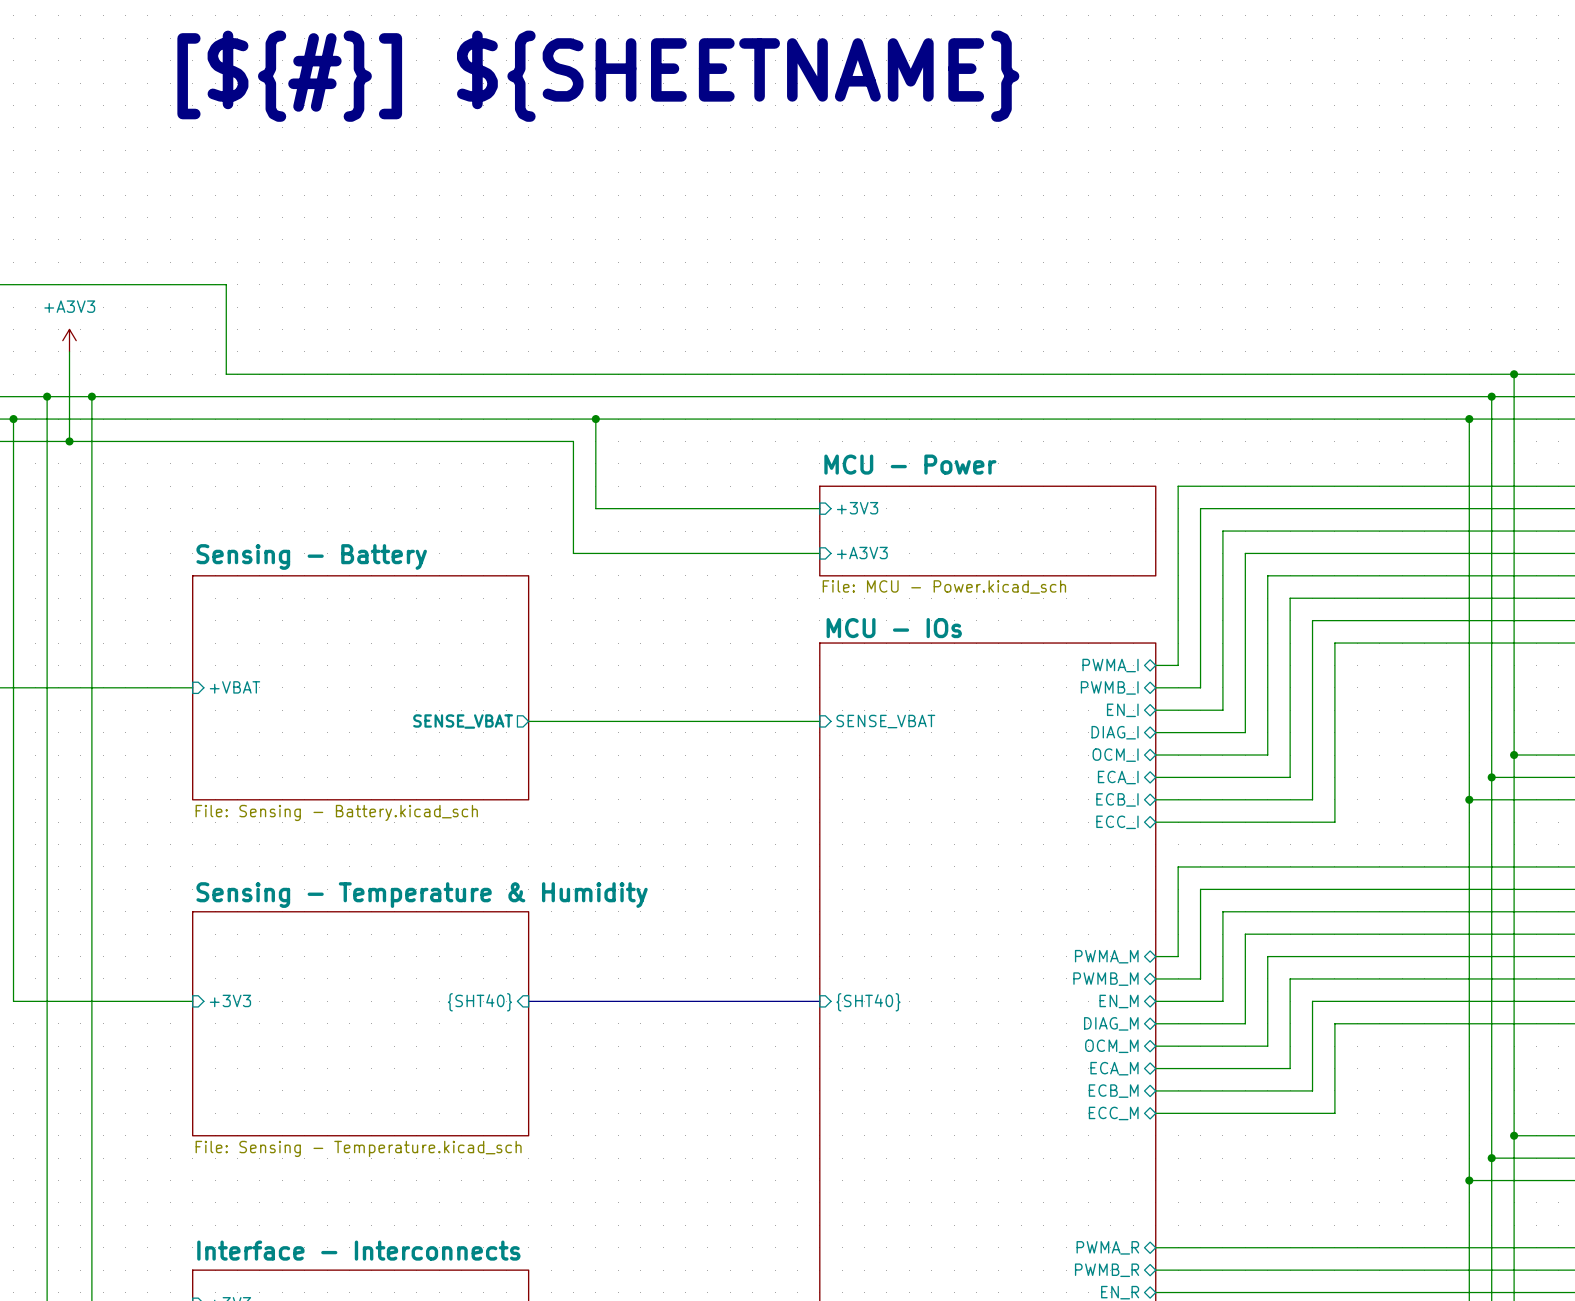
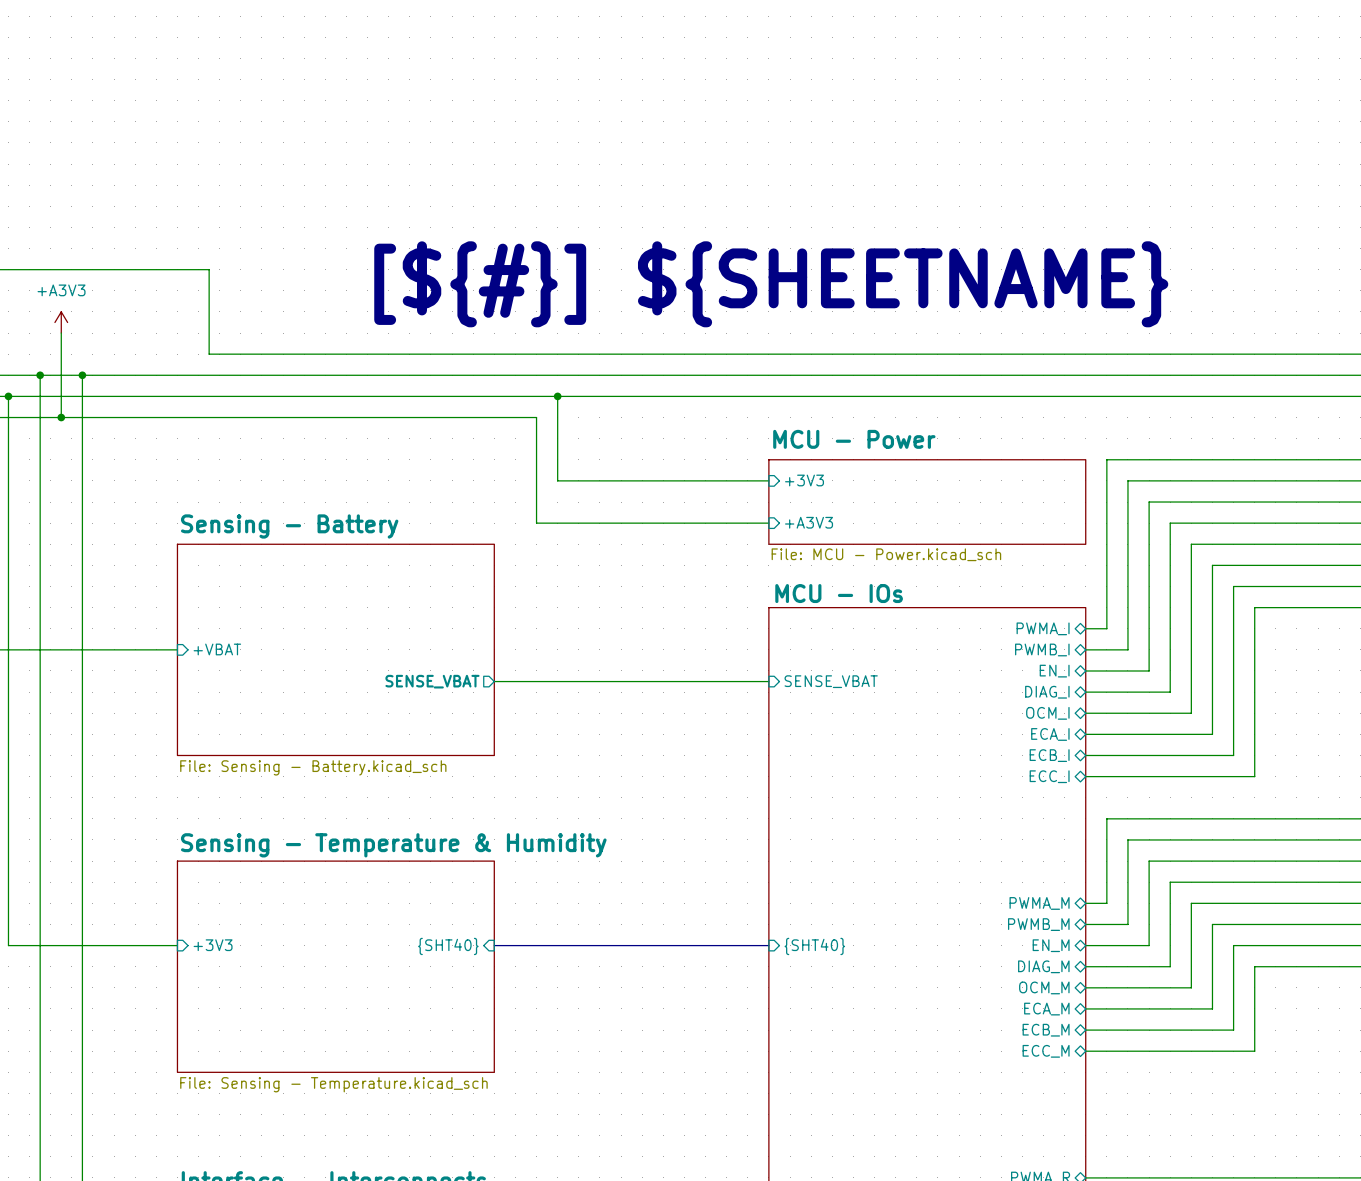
text: [${#}] ${SHEETNAME} (598, 76) -> none
text: none -> [${#}] ${SHEETNAME} (771, 284)

